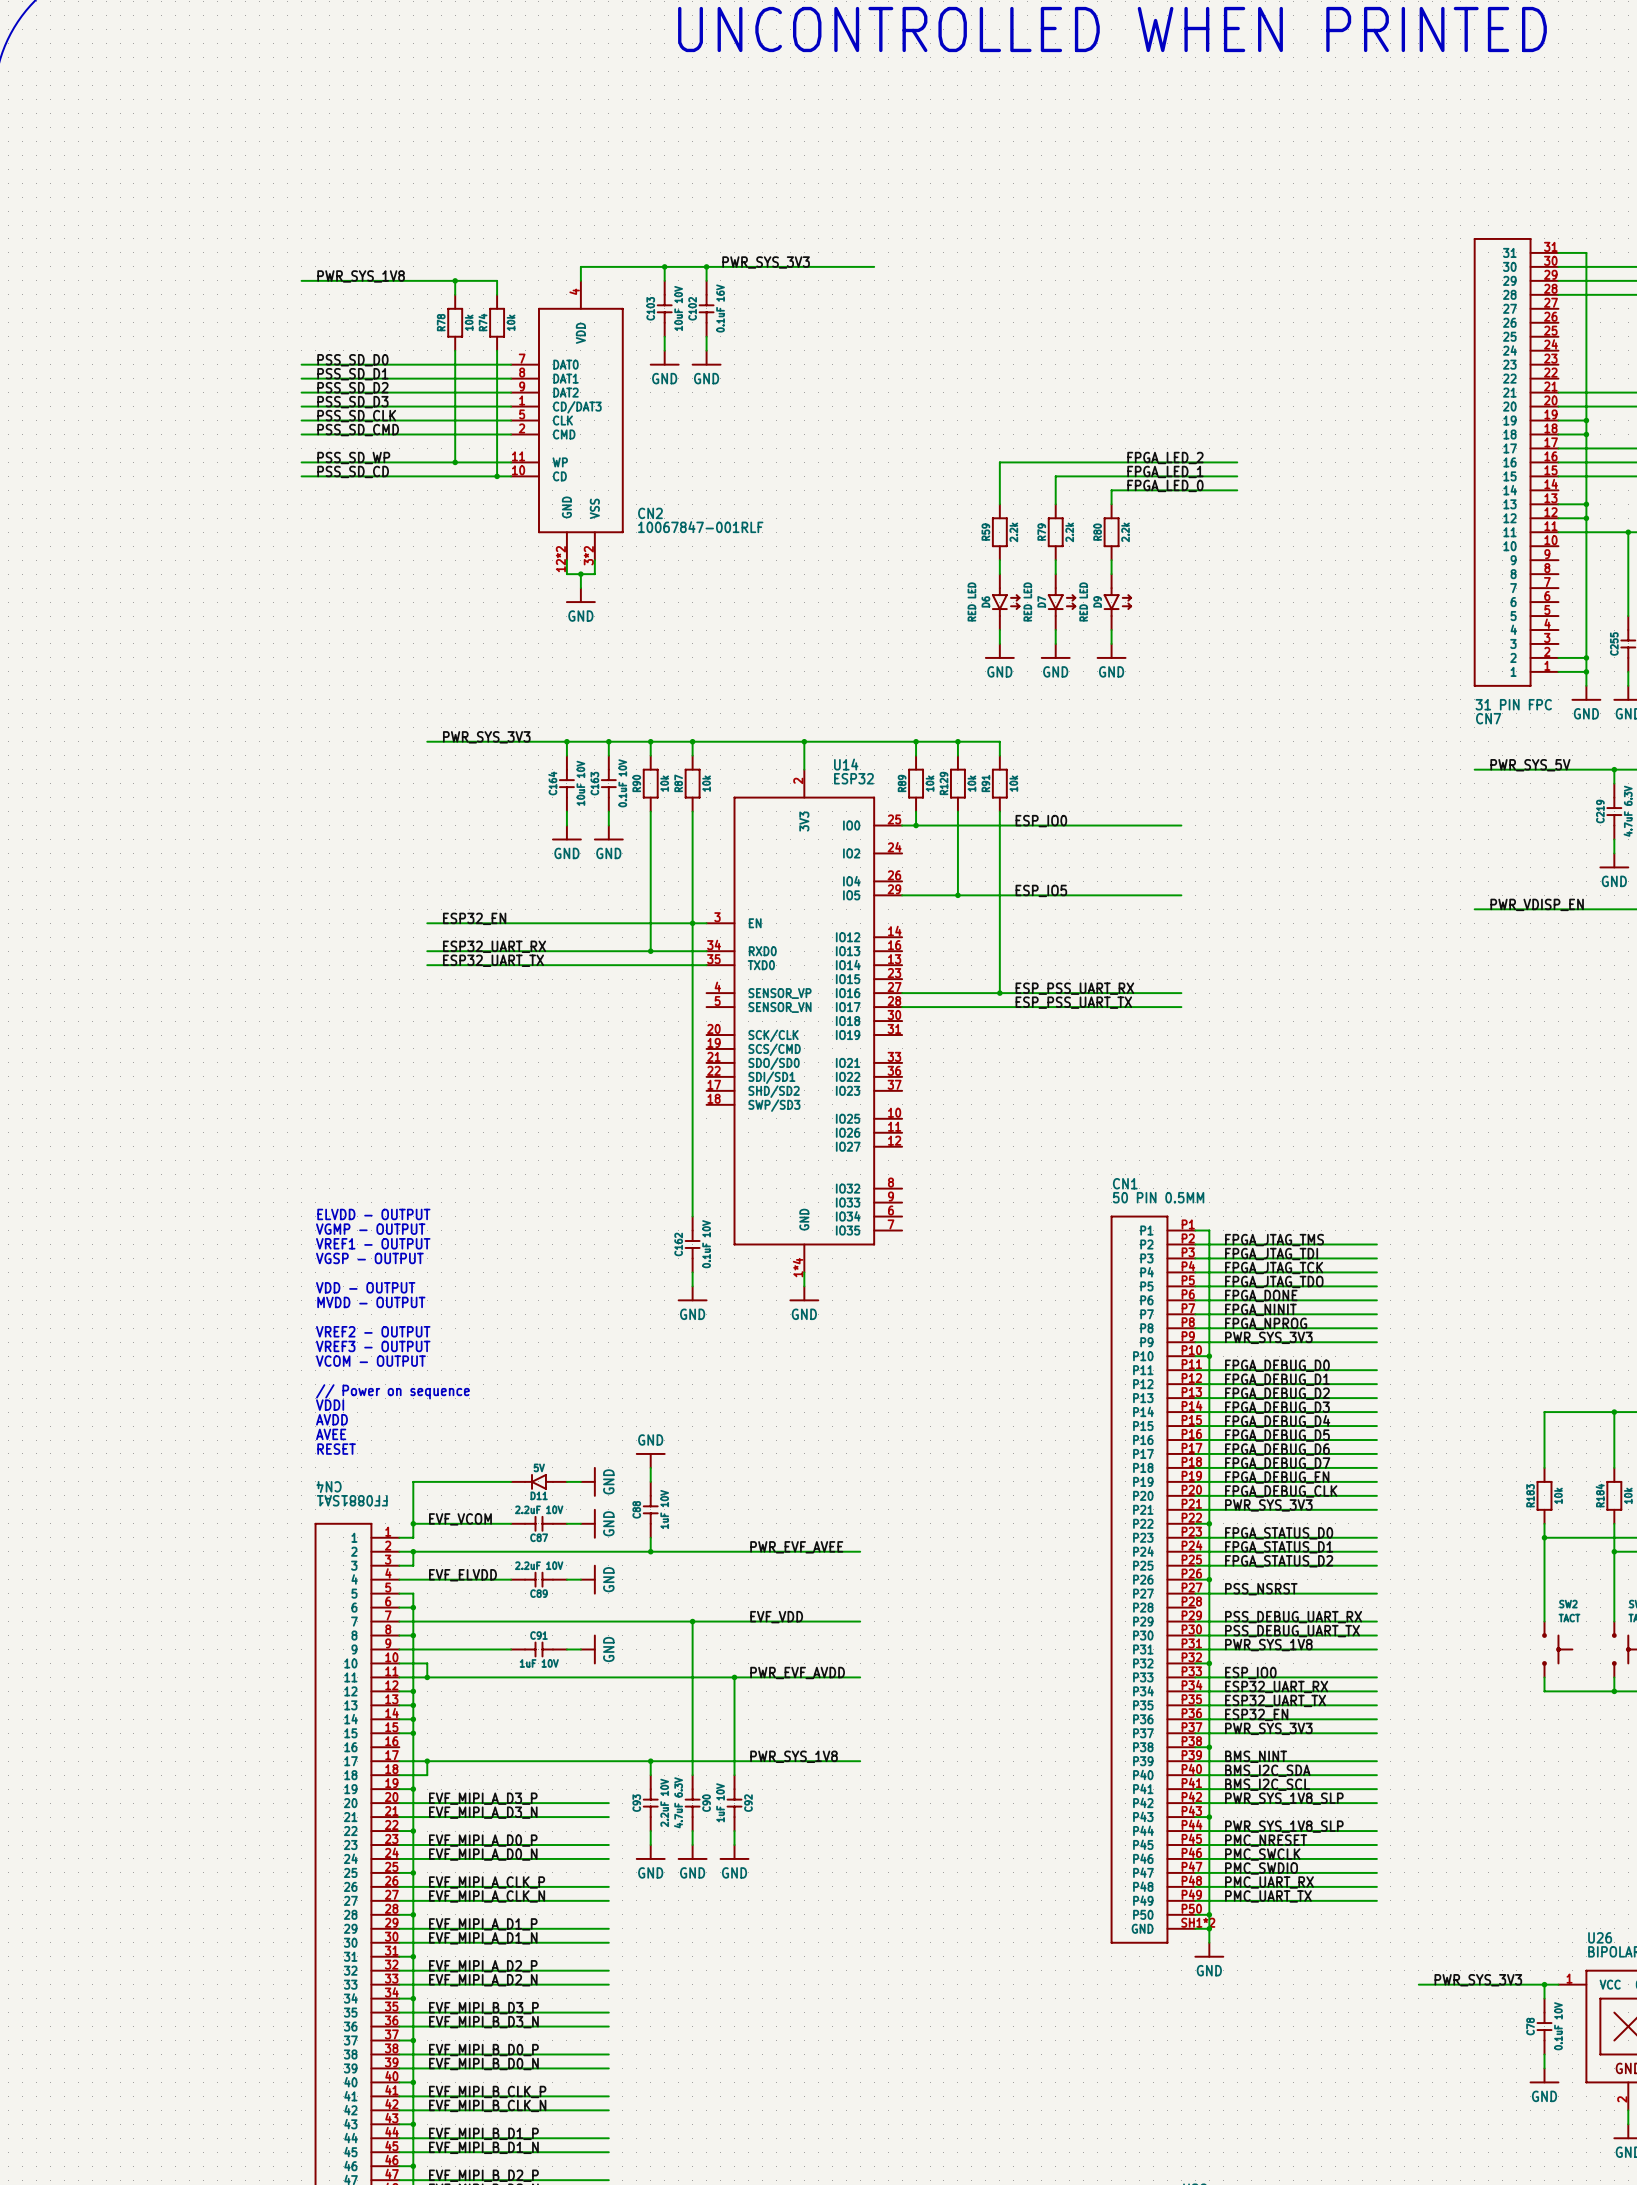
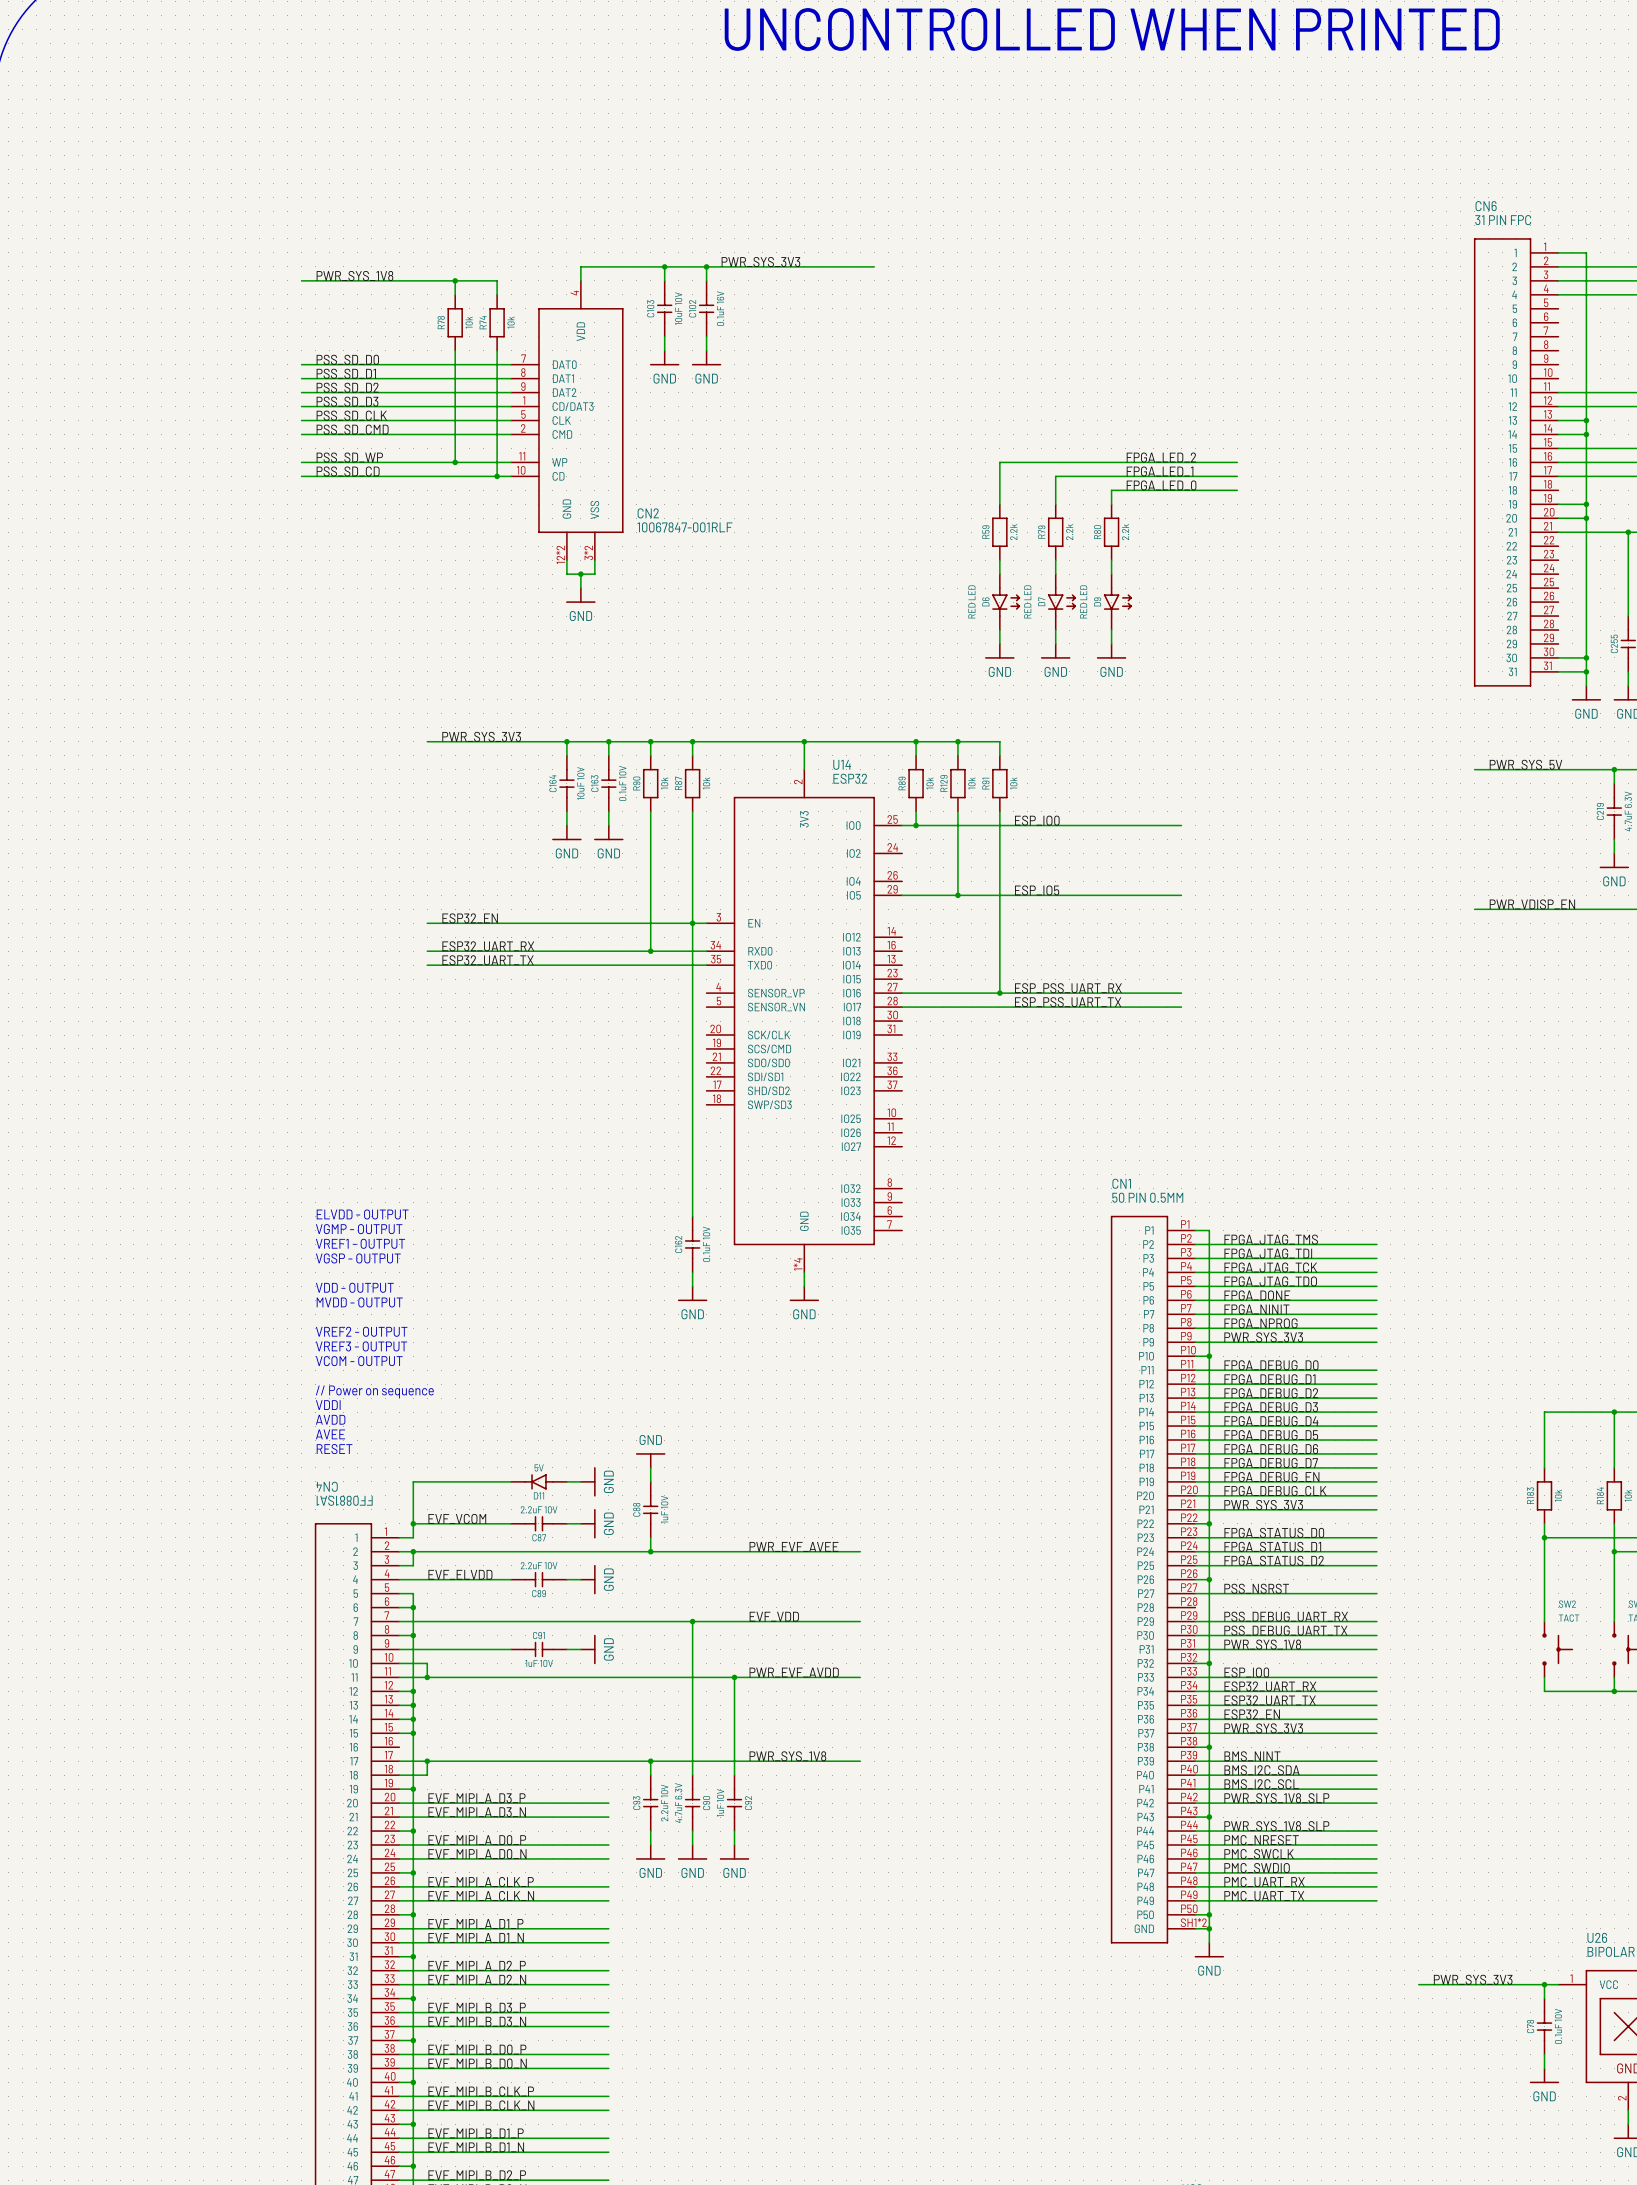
CN7 flip: as is (1502, 462) -> up-down (1502, 462)
CN7 name: CN7 (1488, 718) -> CN6 (1486, 206)

